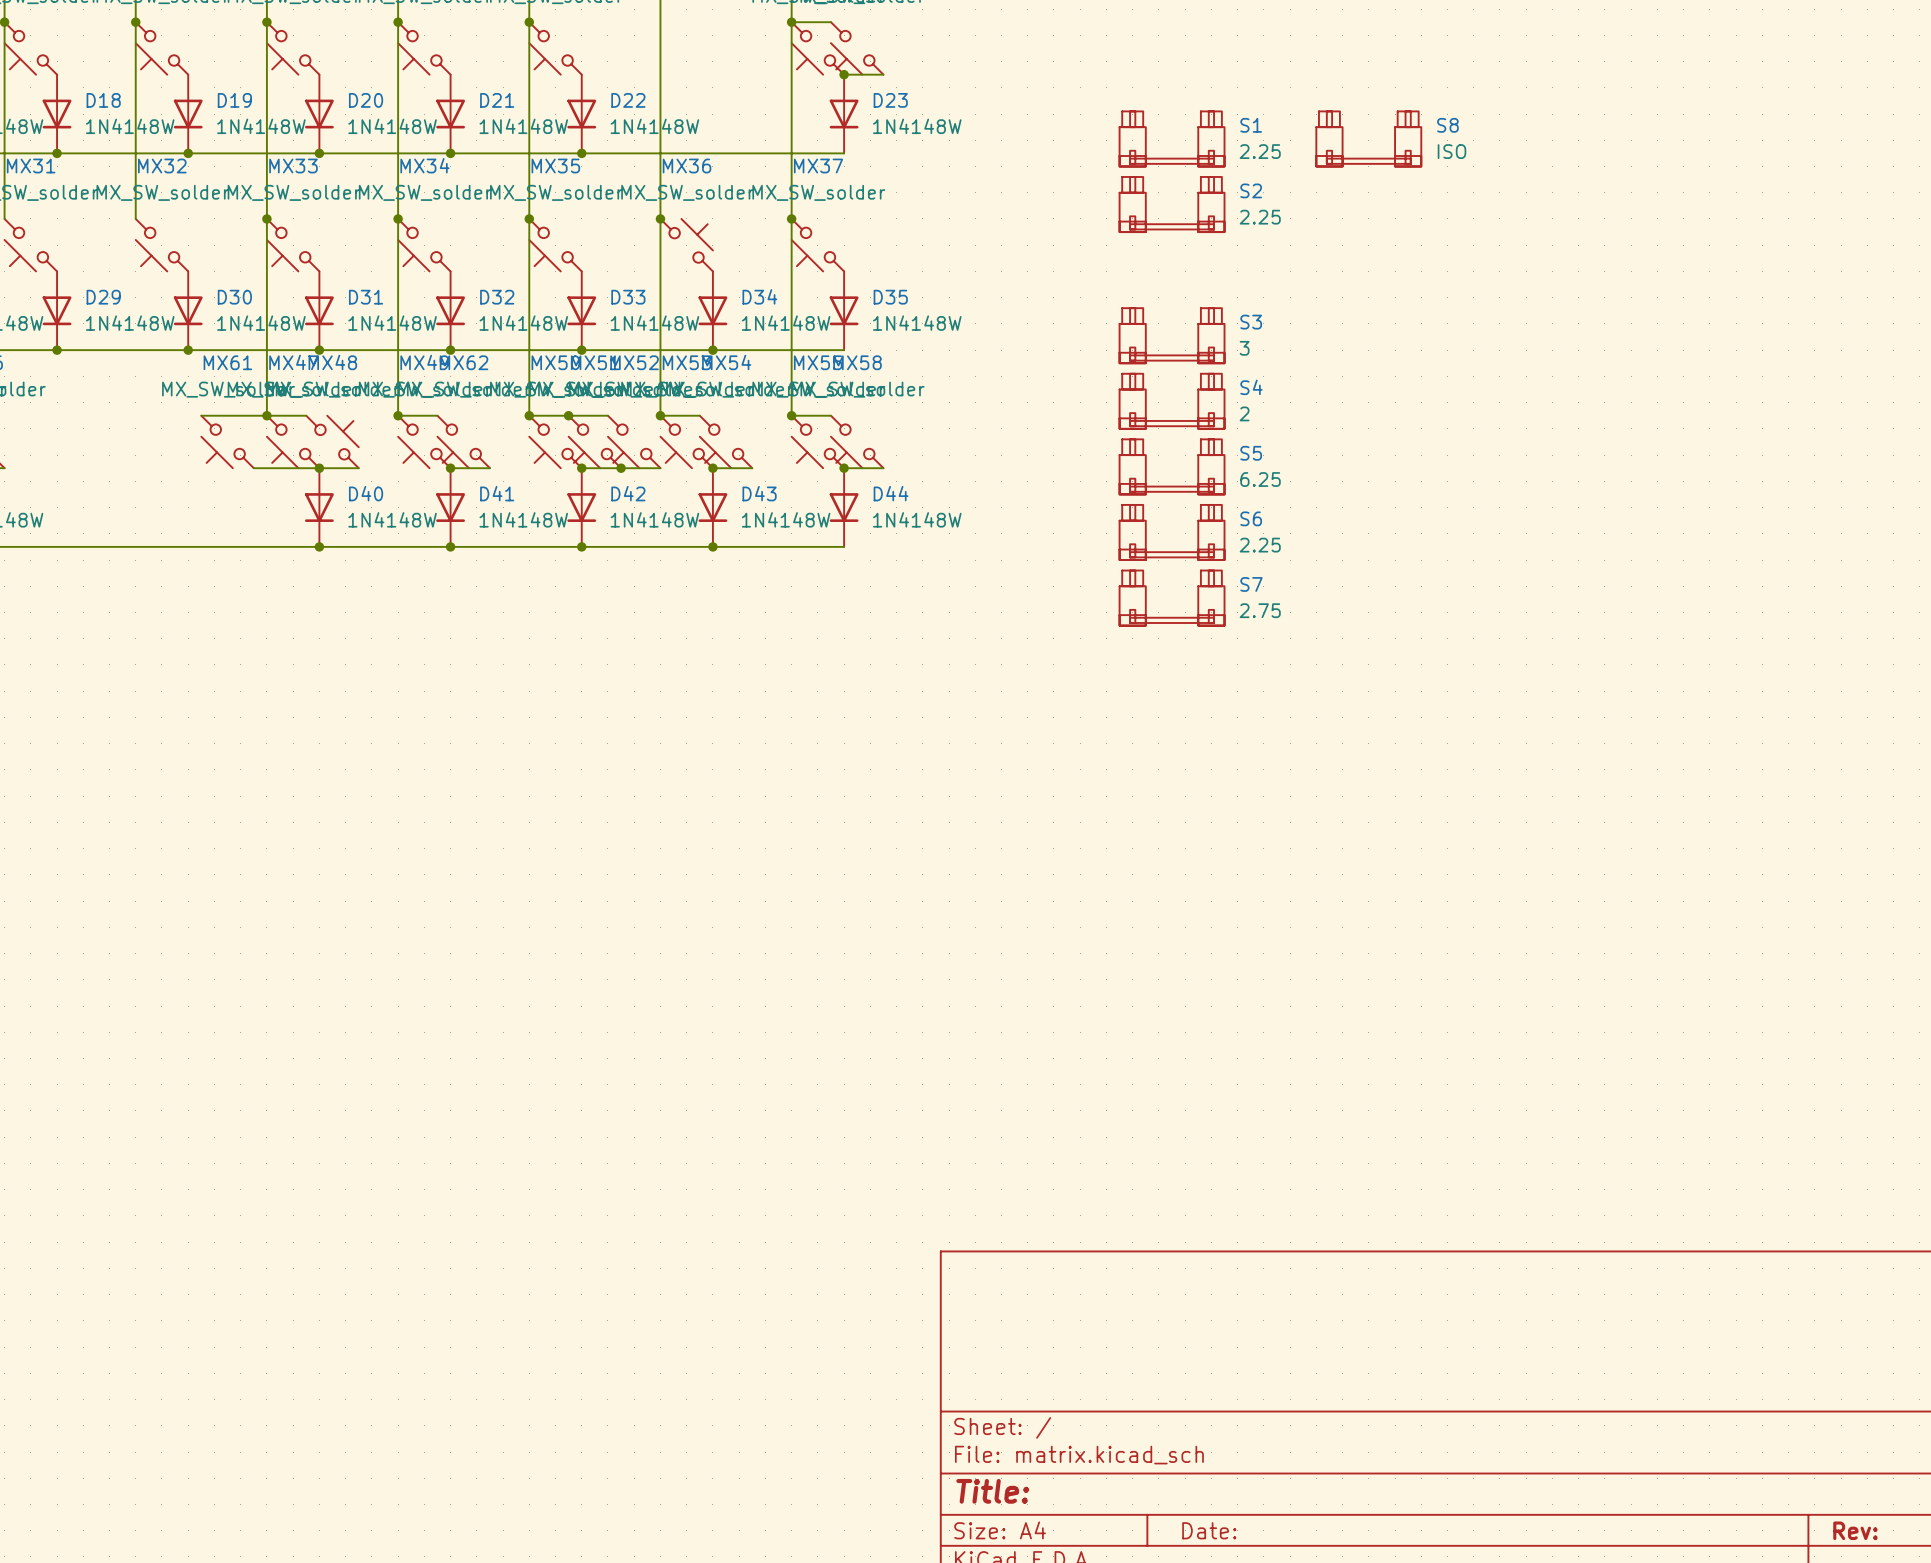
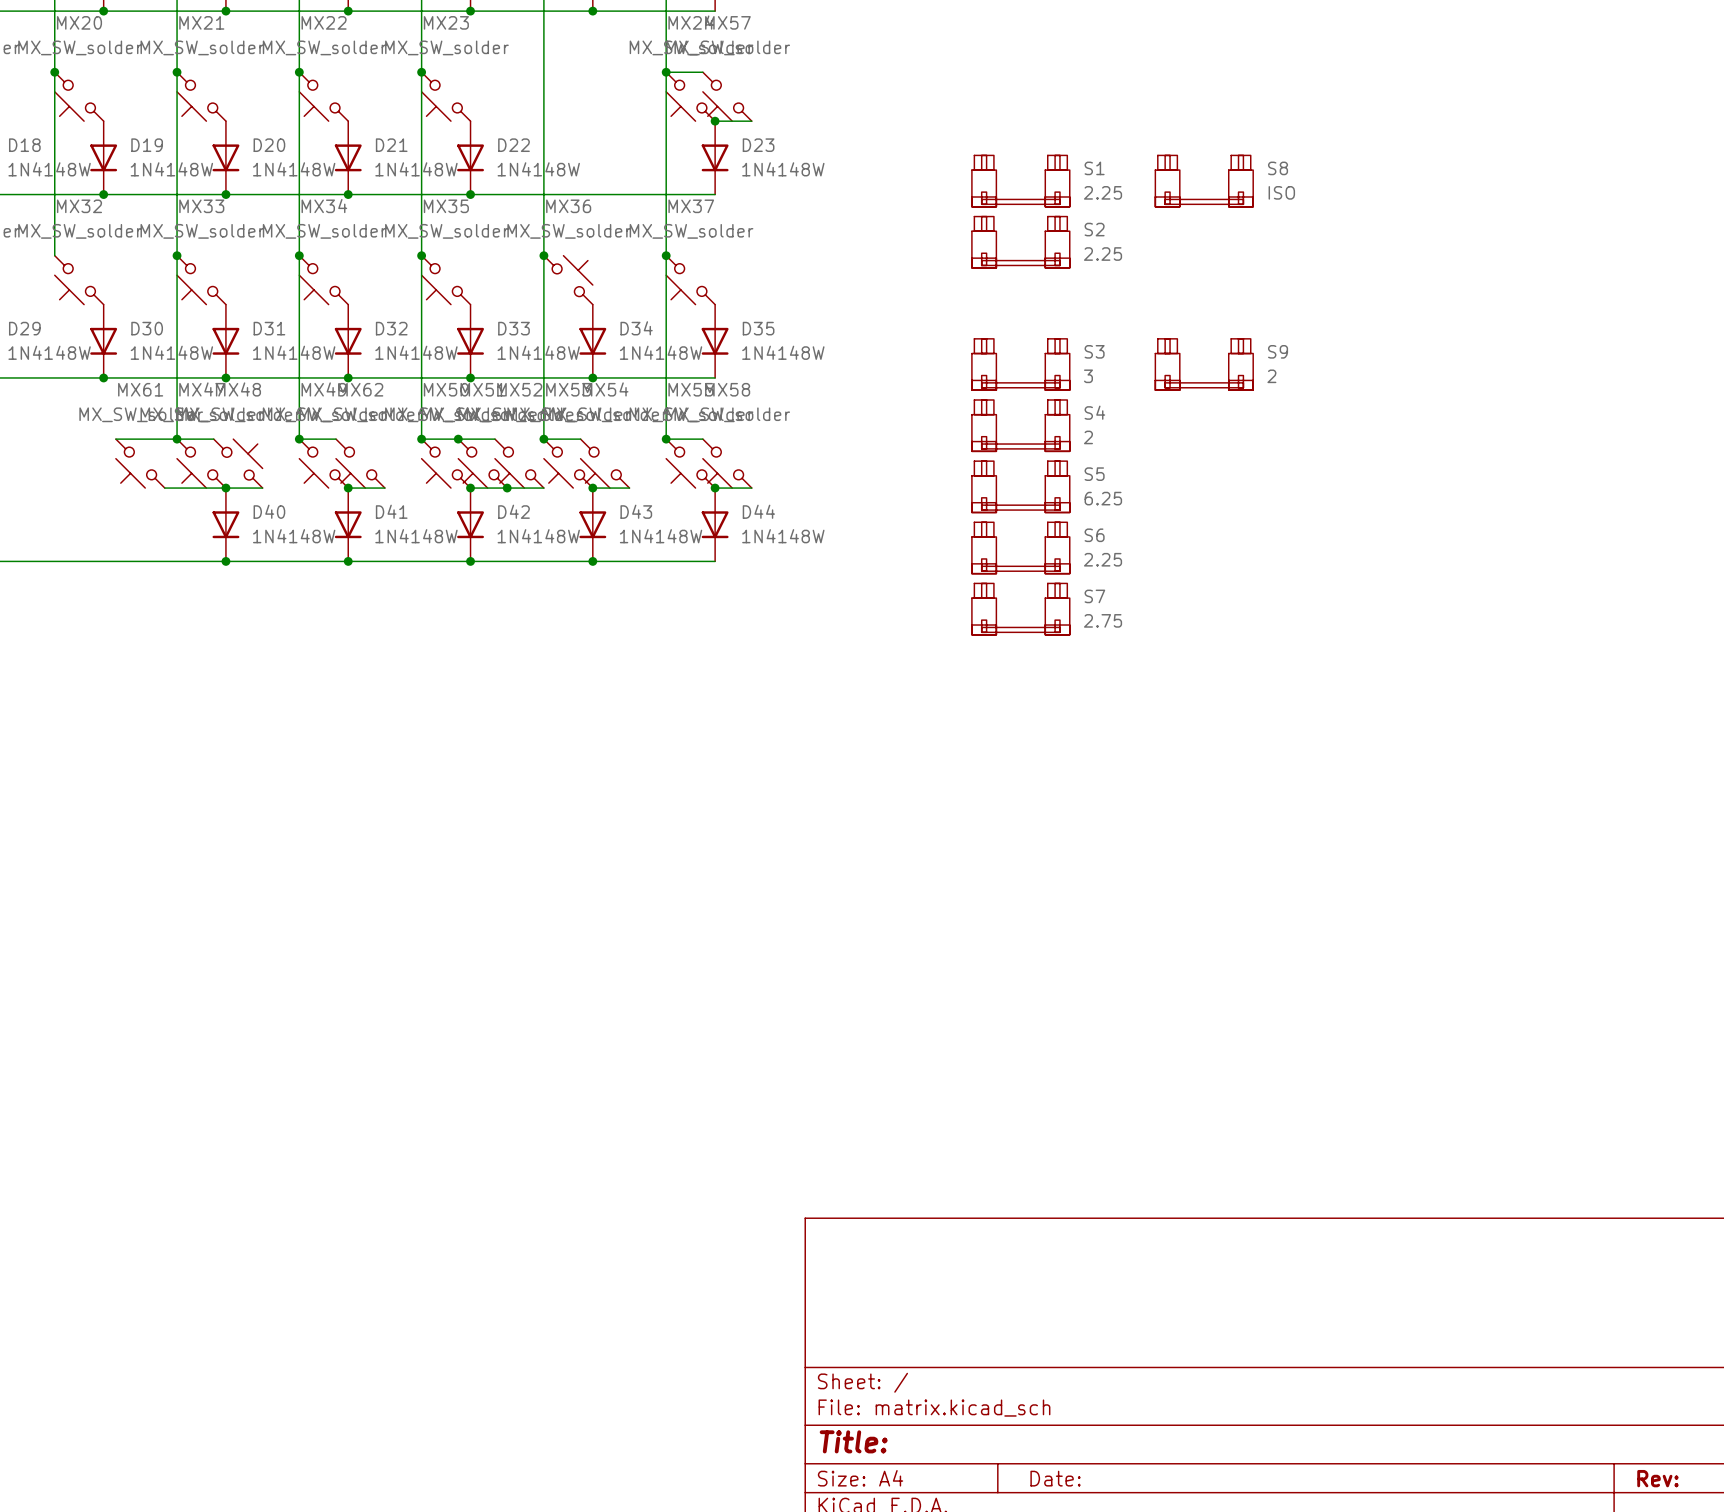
S9: none -> 2 (1204, 364)

